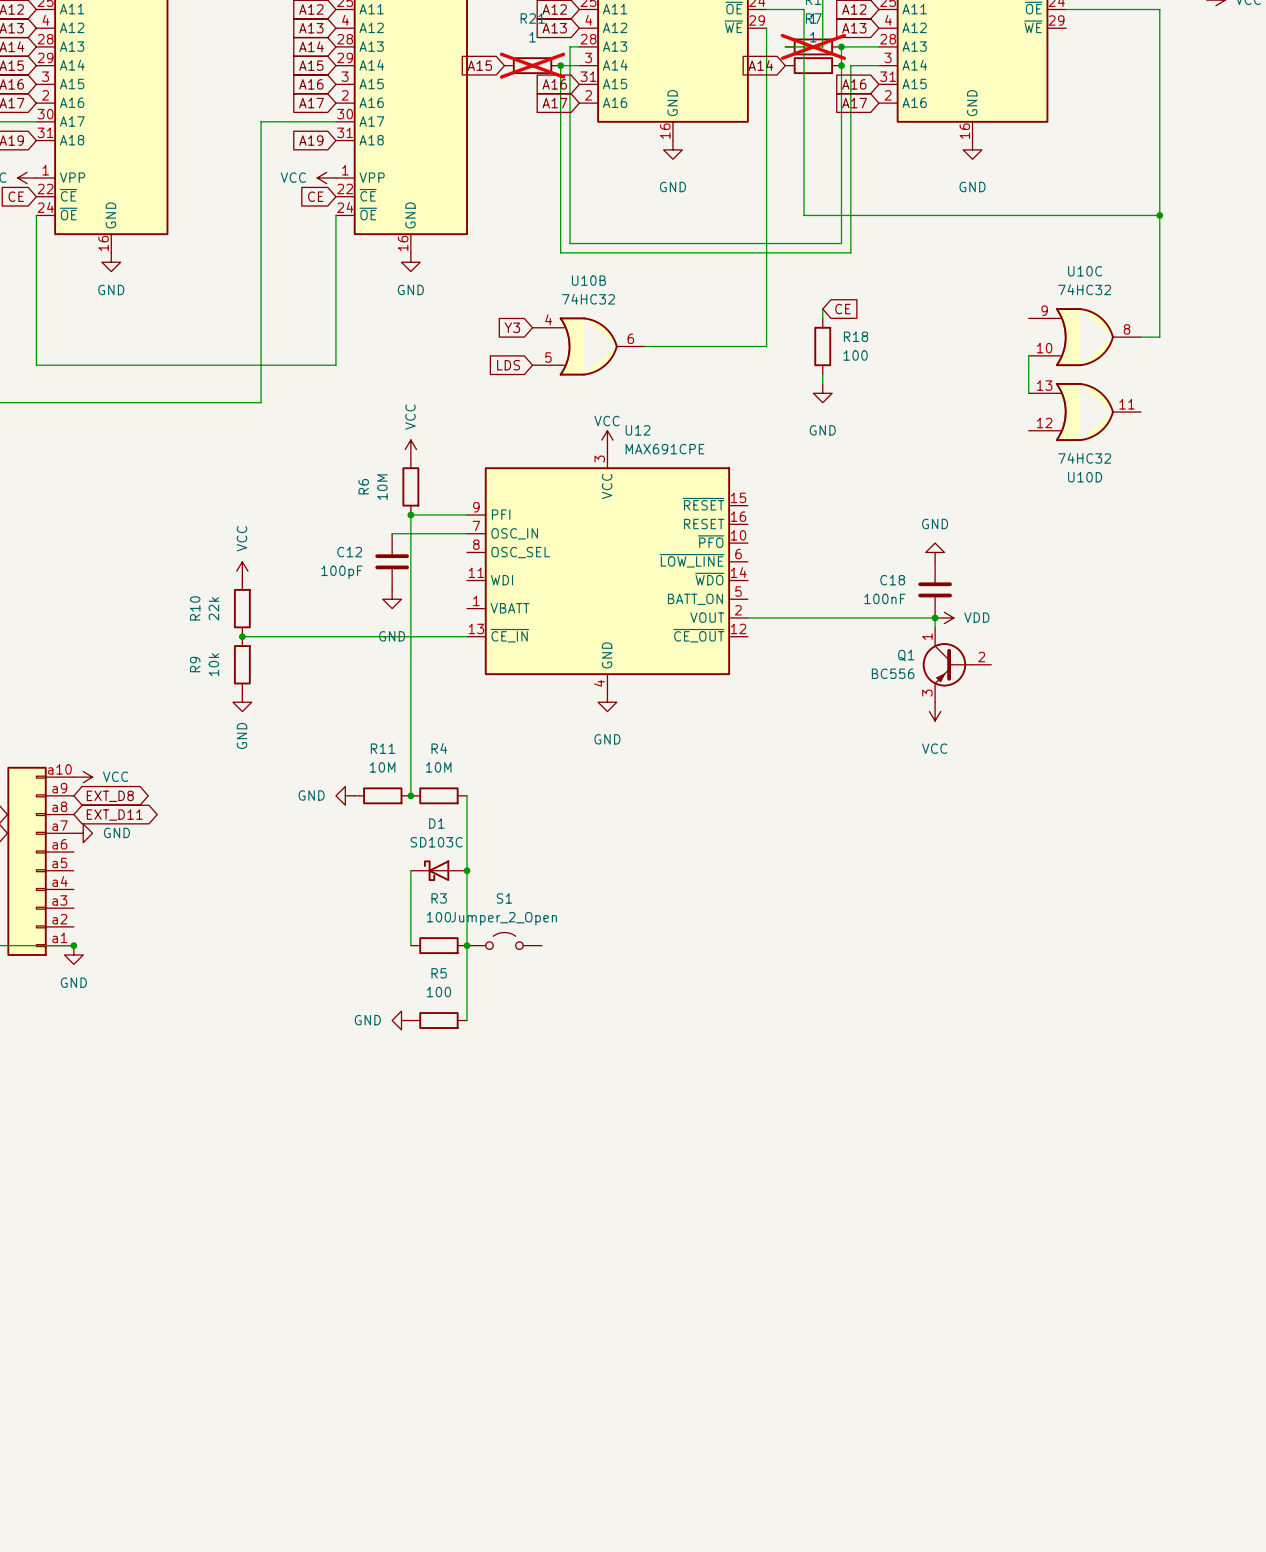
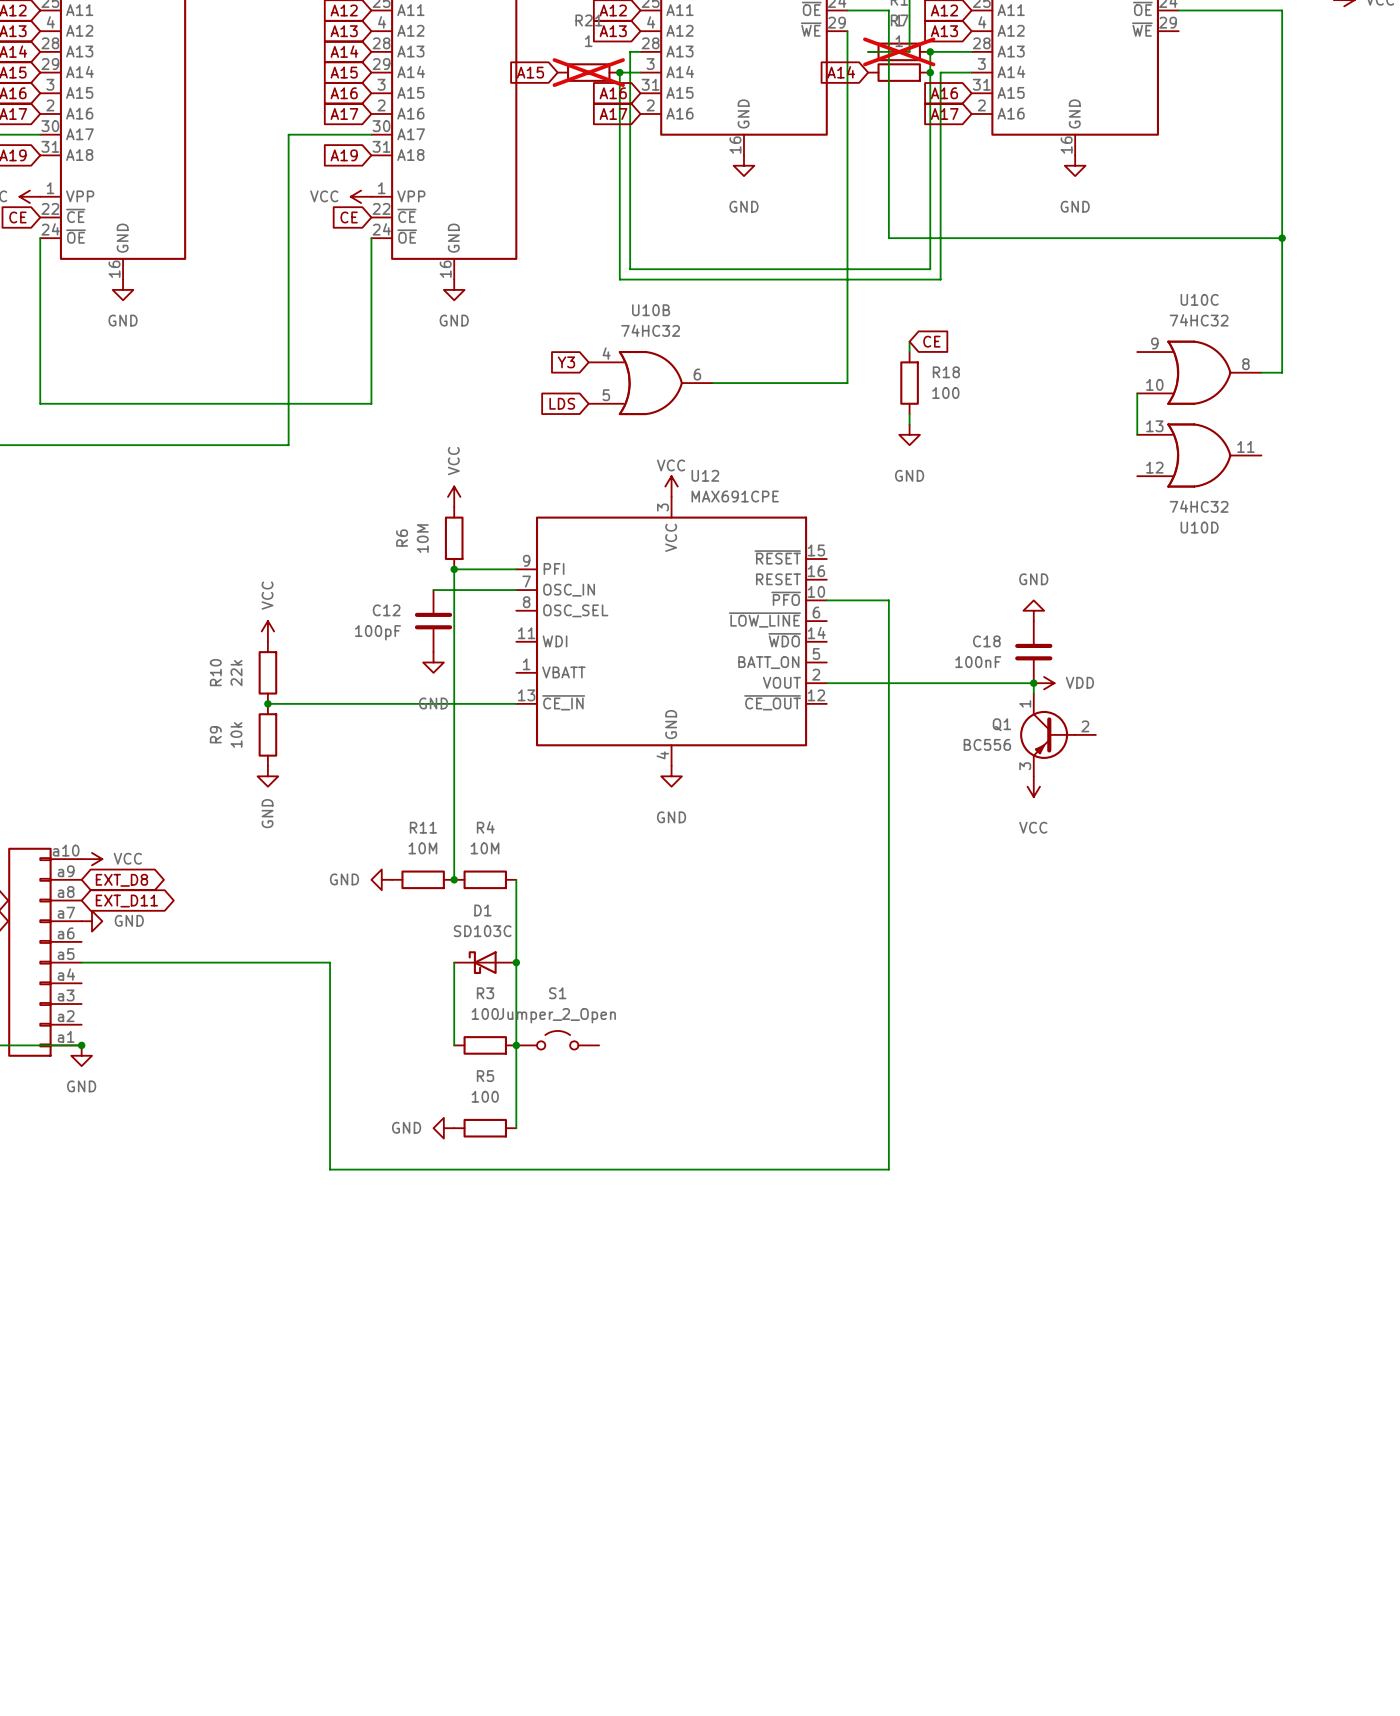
wire: none -> (826, 600) (888, 600) (888, 1169) (330, 1169) (330, 962) (81, 962)

